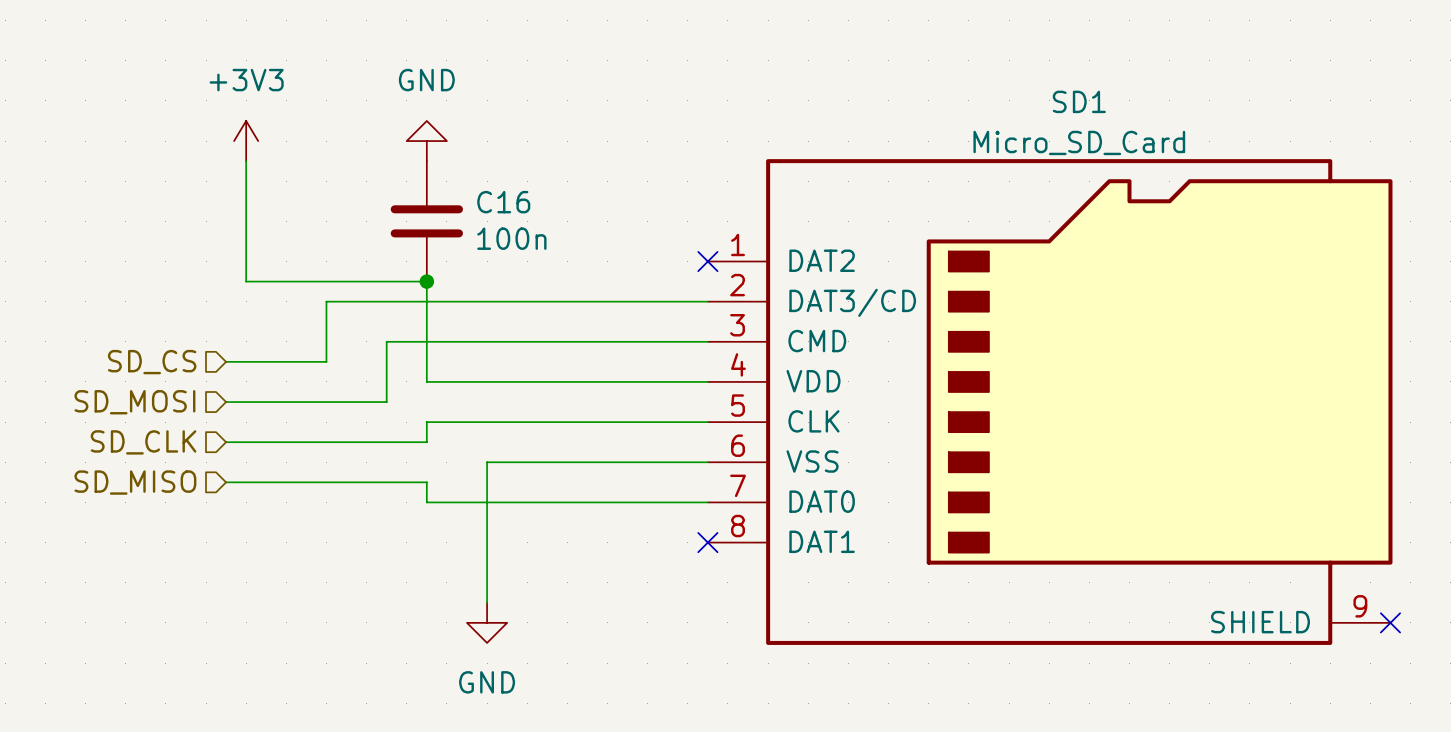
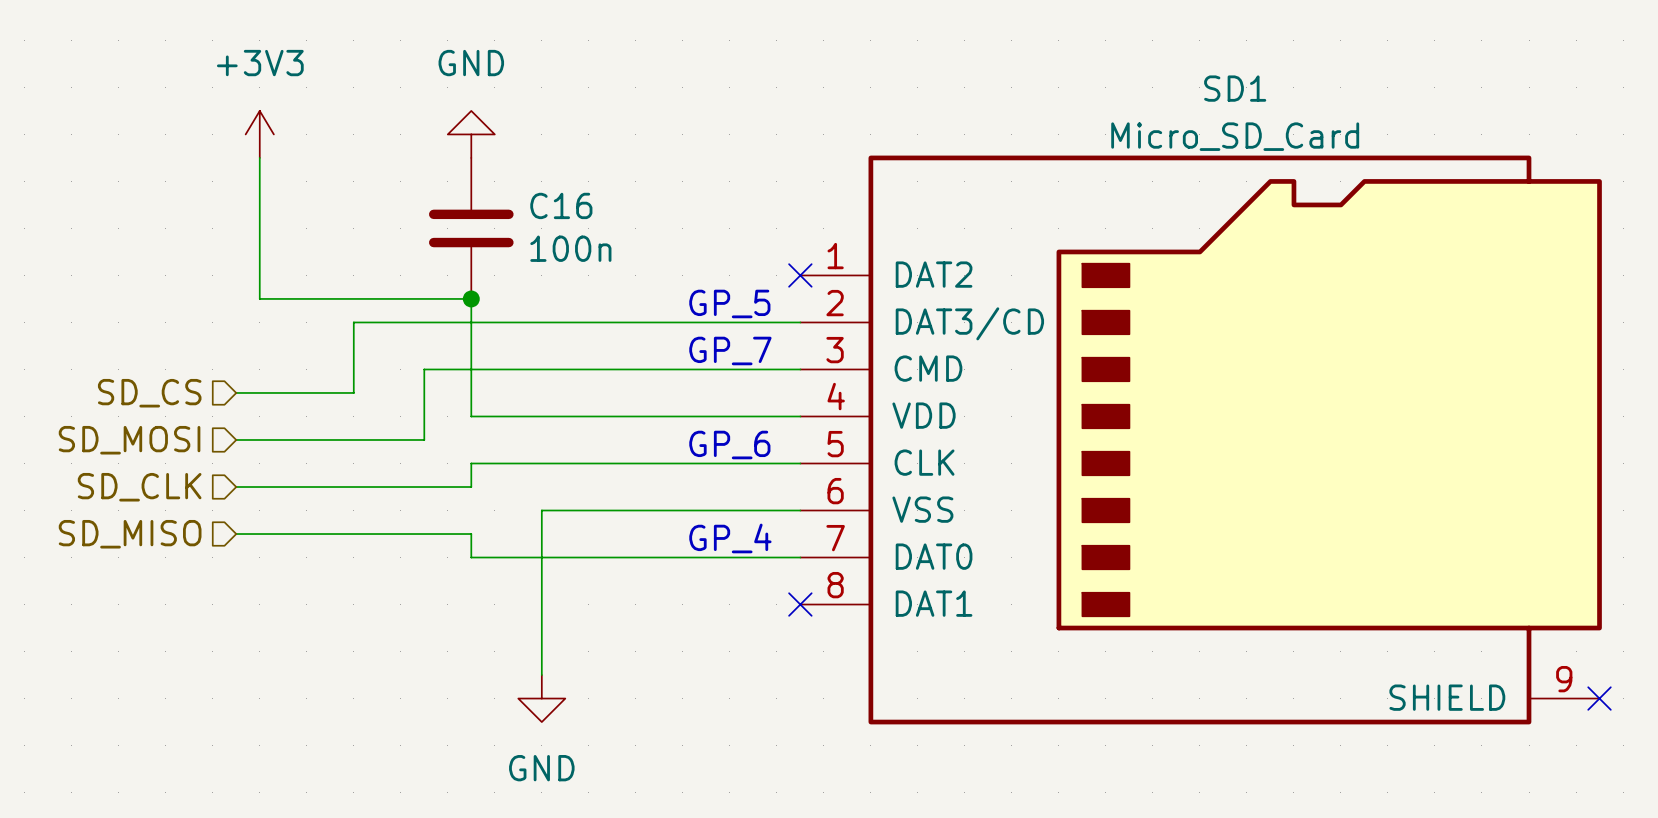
text: none -> GP_5 (729, 303)
text: none -> GP_7 (730, 350)
text: none -> GP_6 (729, 445)
text: none -> GP_4 (730, 538)

